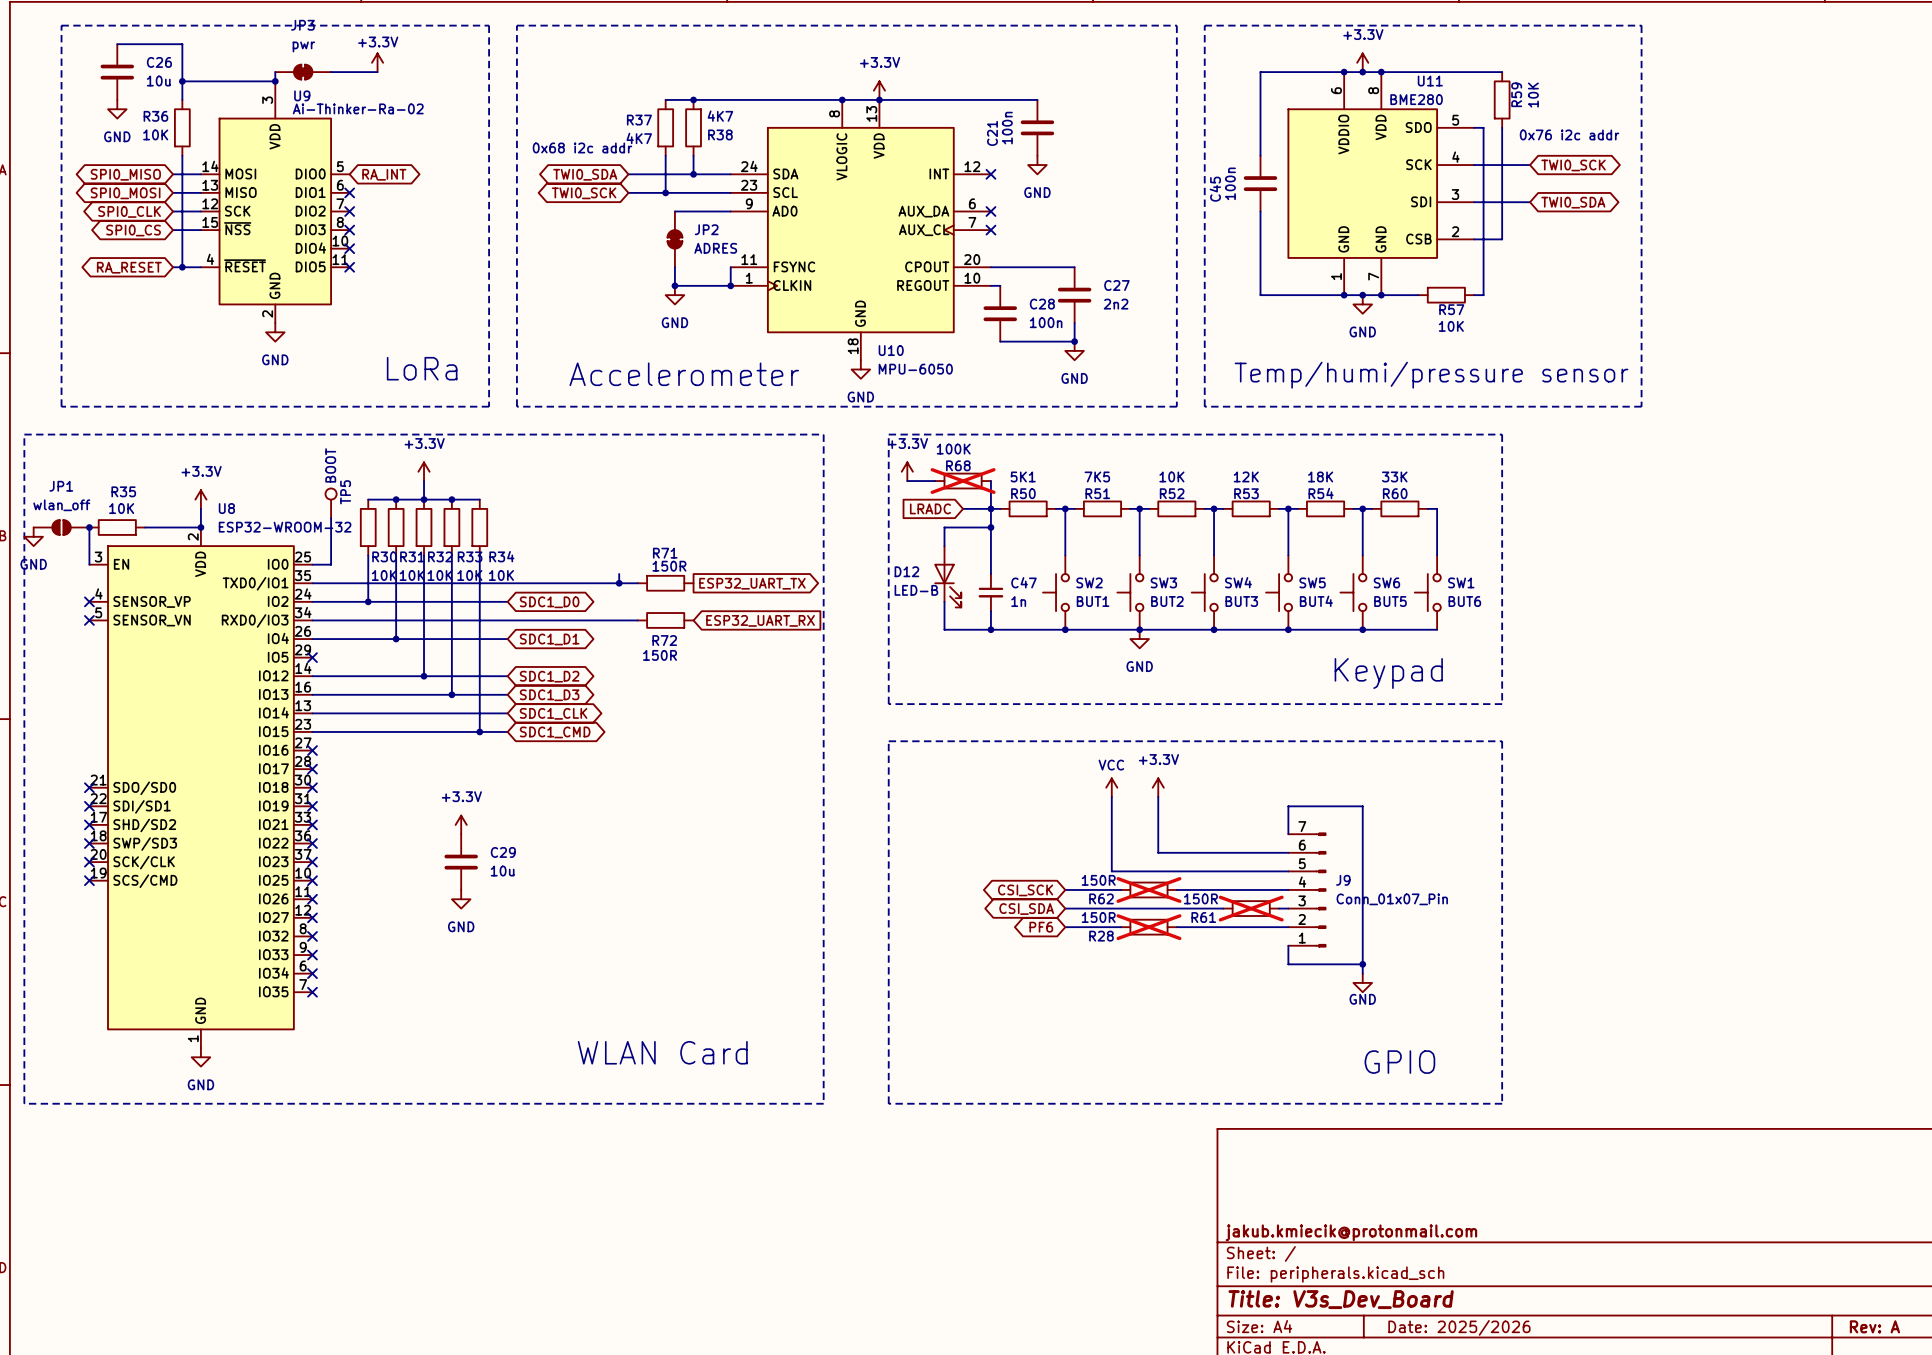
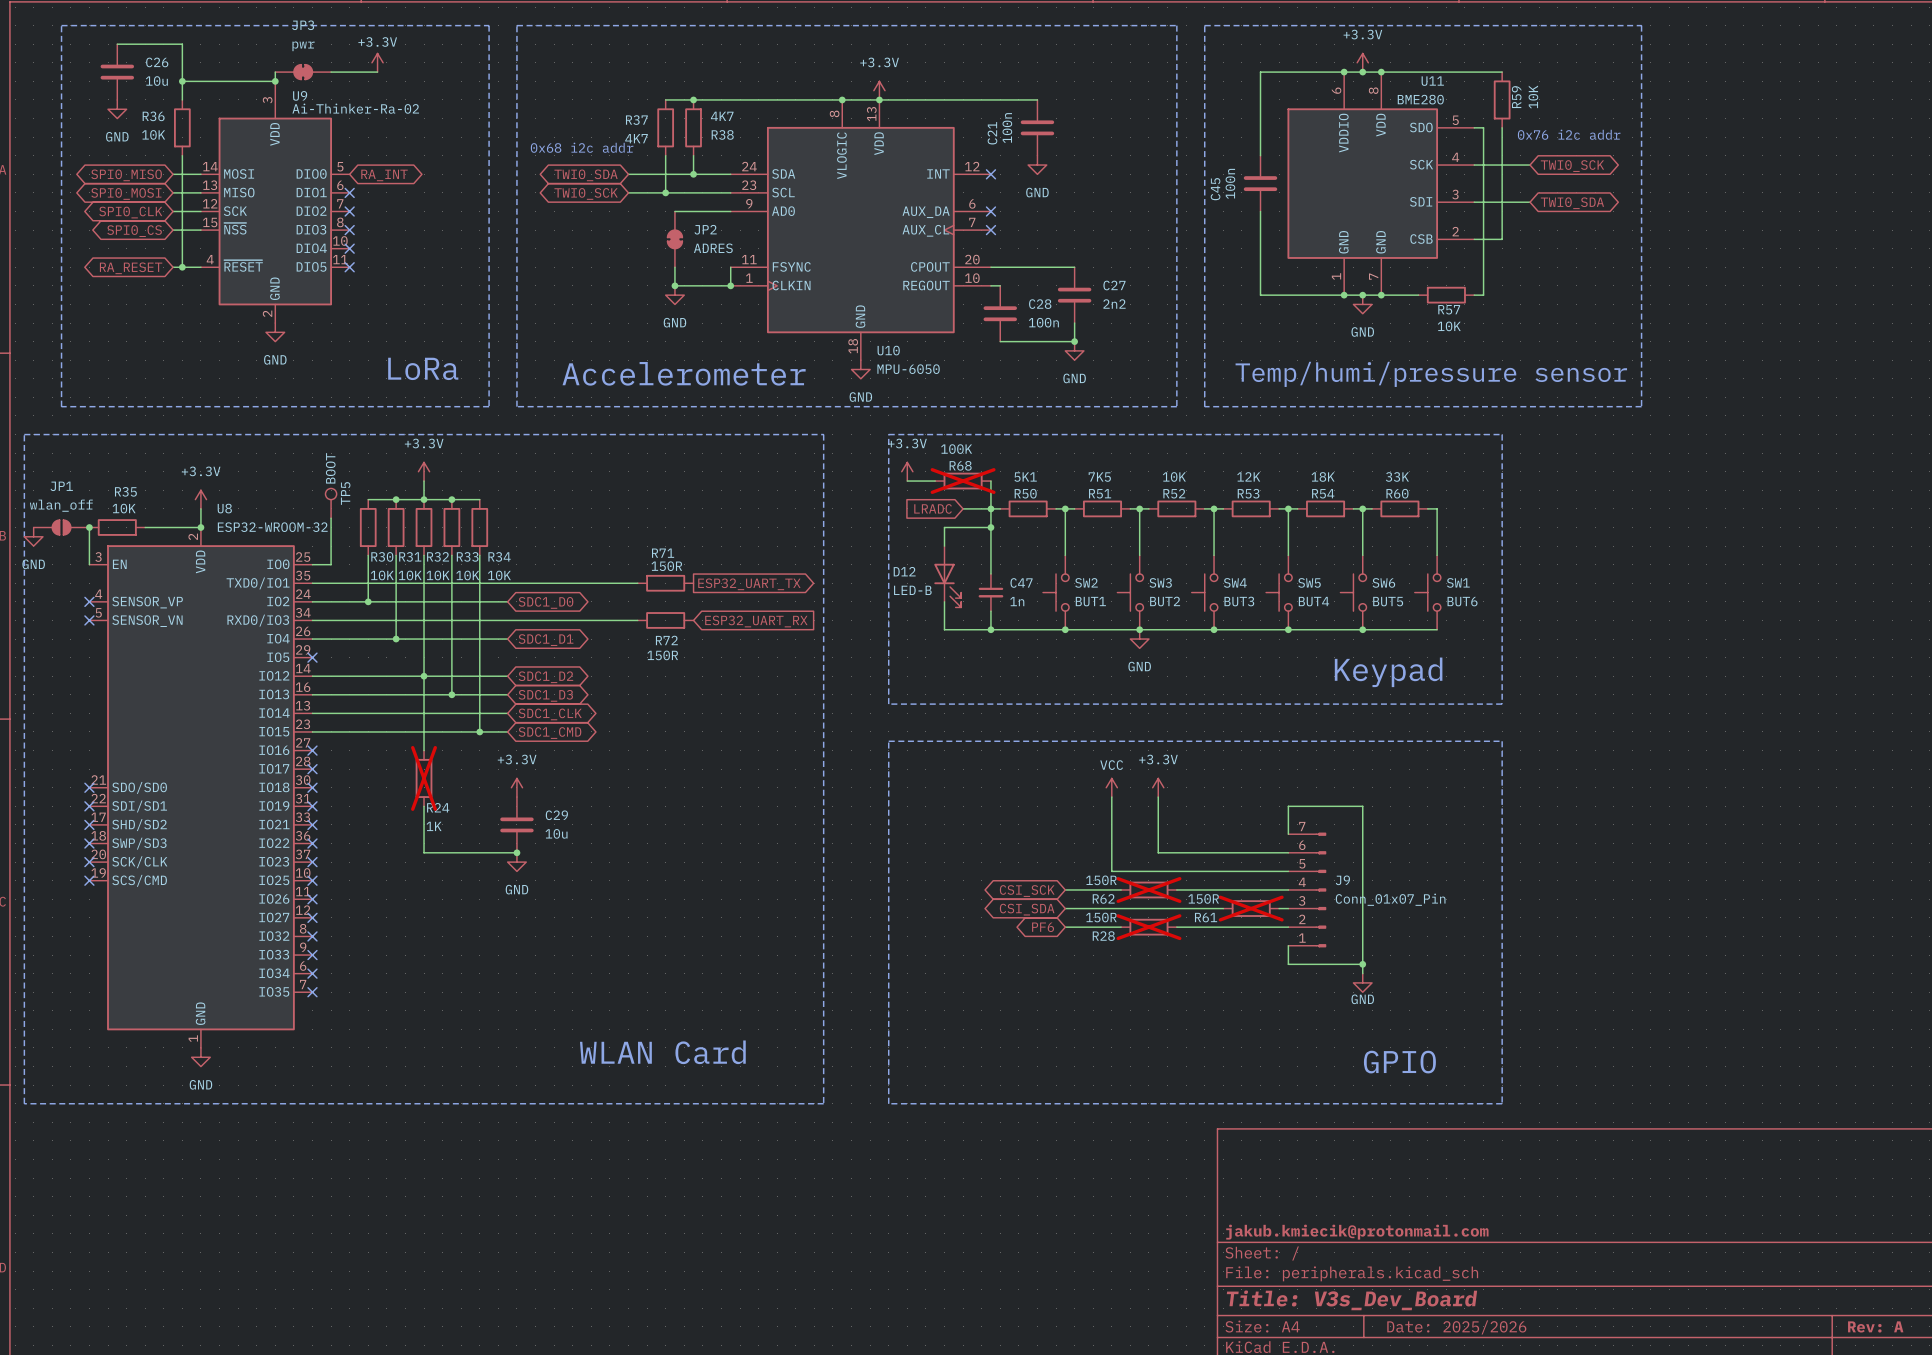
wire: (619, 573) (619, 583) -> none
junction: (619, 583) -> none
wire: none -> (424, 676) (424, 750)
R24: none -> 1K (424, 778)
wire: none -> (424, 806) (424, 852) (516, 852)
power symbol position: +3.3V (461, 824) -> +3.3V (516, 787)
junction: none -> (516, 852)
C29 position: (461, 862) -> (516, 824)
power symbol position: GND (461, 899) -> GND (516, 862)

